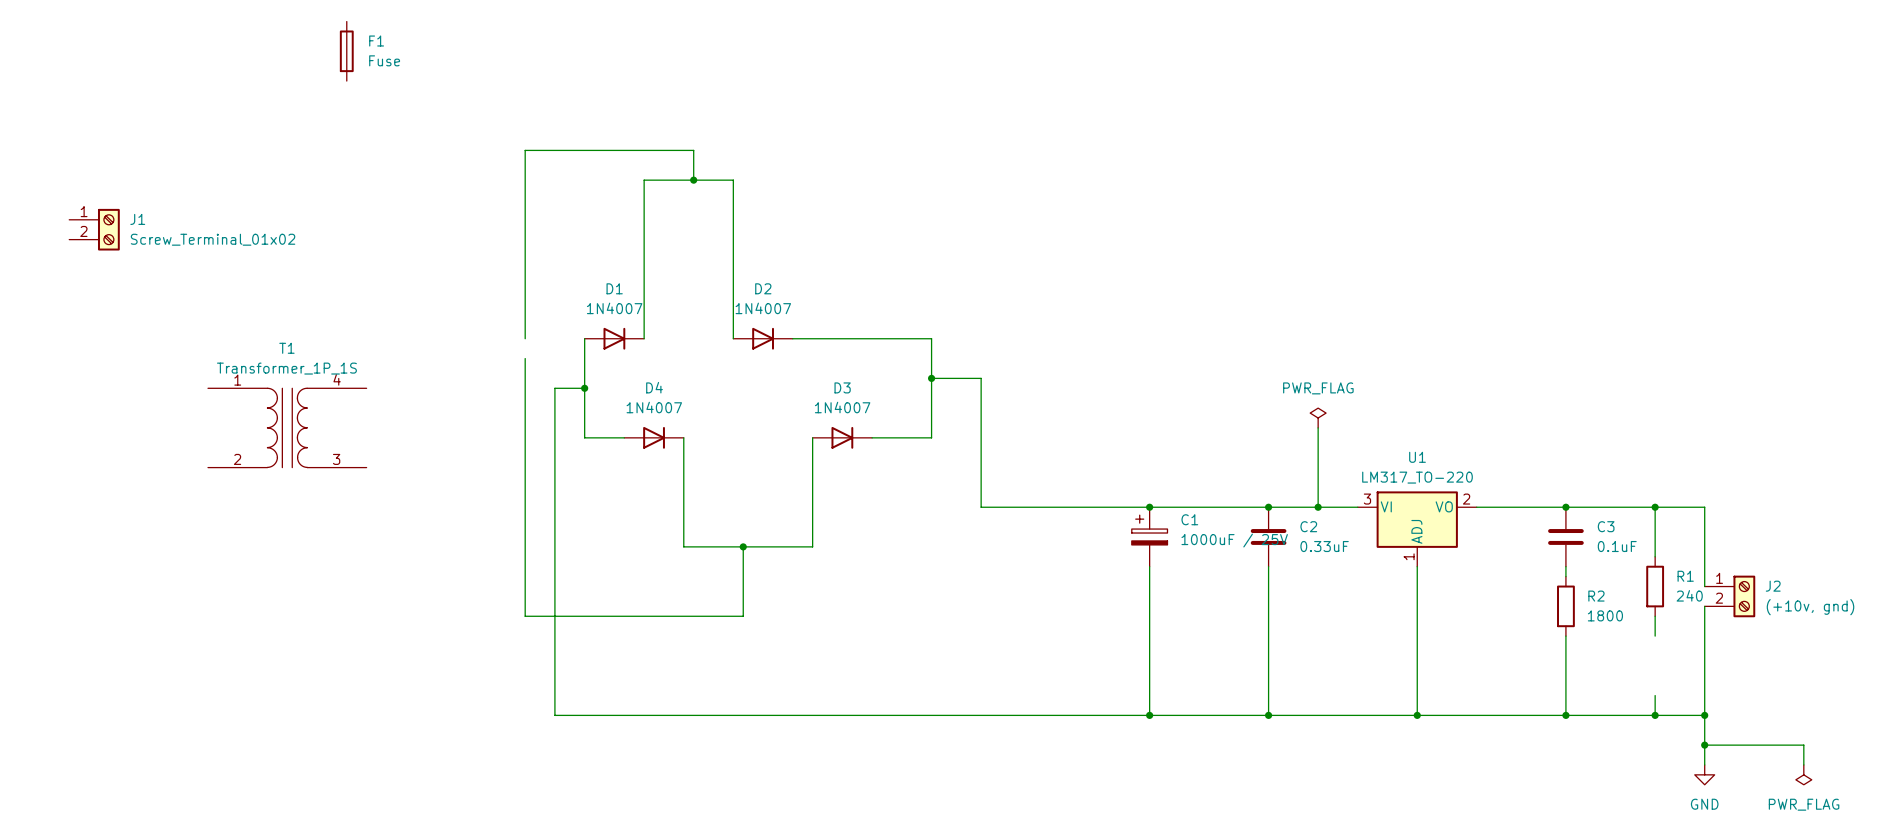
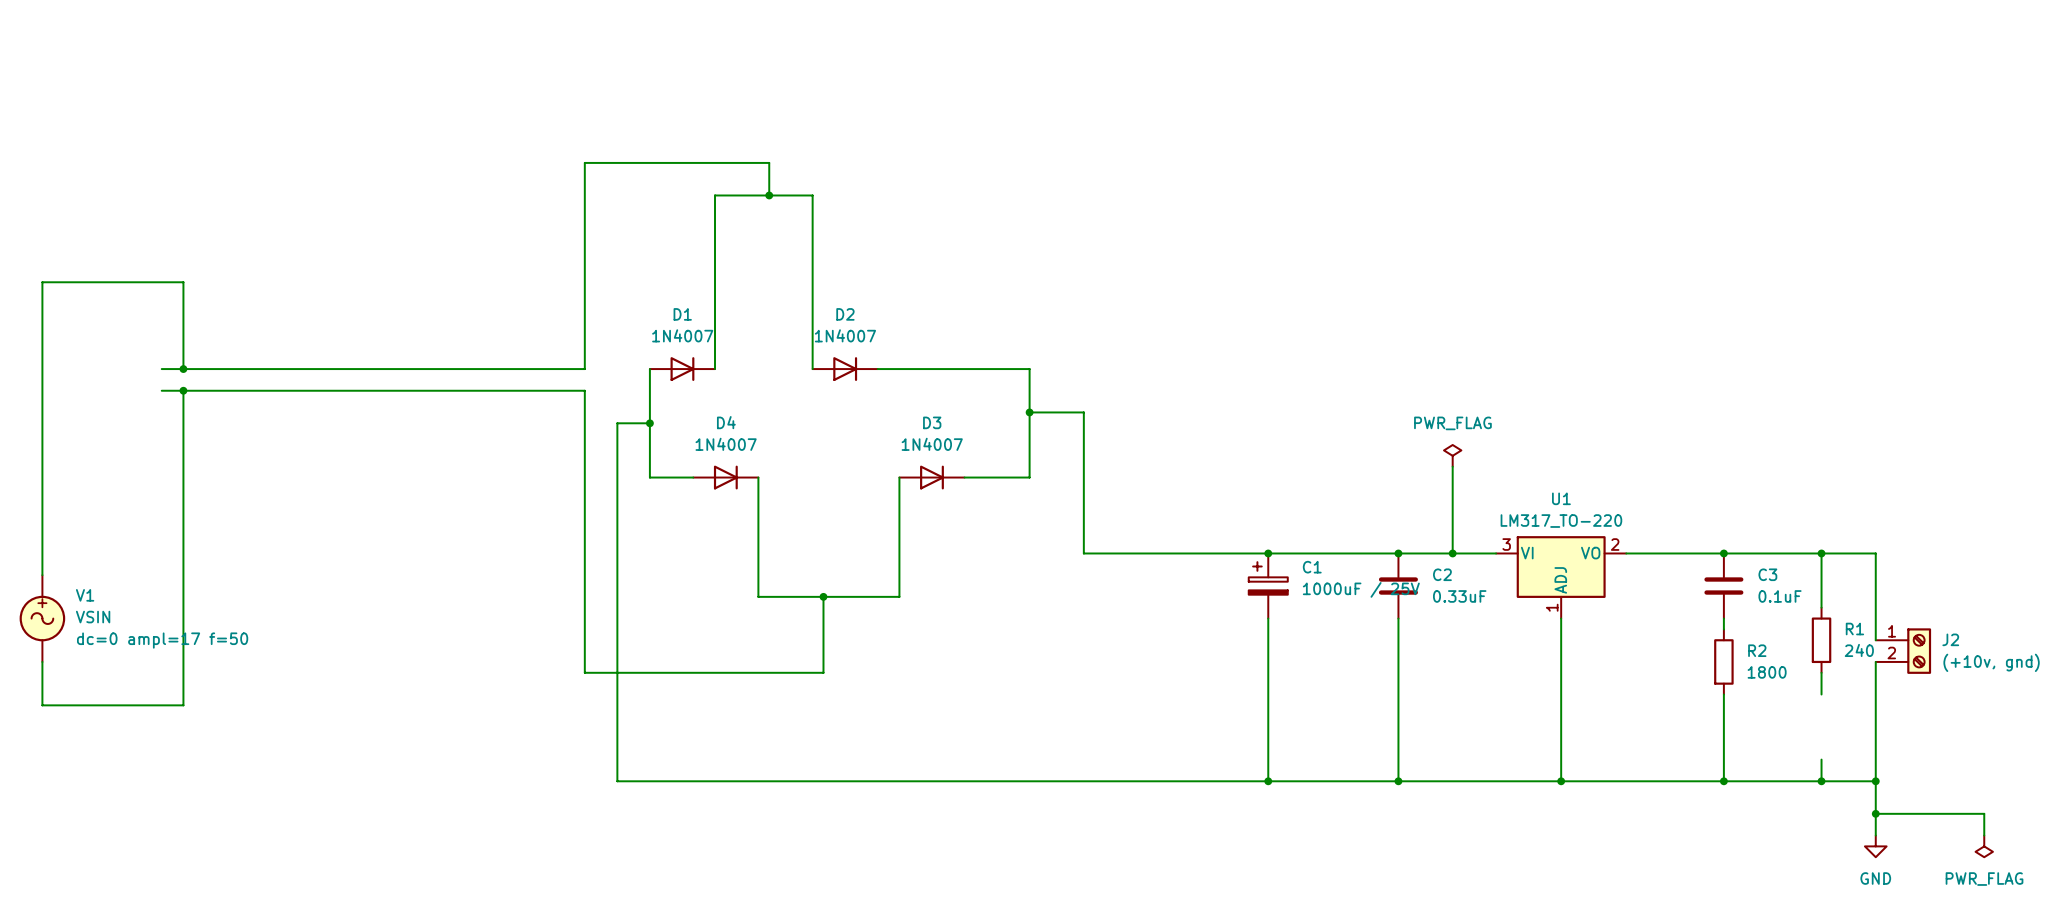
F1: Fuse (346, 51) -> none
J1: Screw_Terminal_01x02 (94, 229) -> none
wire: none -> (161, 369) (584, 369)
wire: none -> (183, 369) (183, 282) (42, 282) (42, 575)
junction: none -> (183, 369)
wire: none -> (161, 390) (584, 390)
wire: none -> (183, 390) (183, 705) (42, 705) (42, 661)
junction: none -> (183, 390)
T1: Transformer_1P_1S (287, 427) -> none
V1: none -> VSIN (42, 618)

